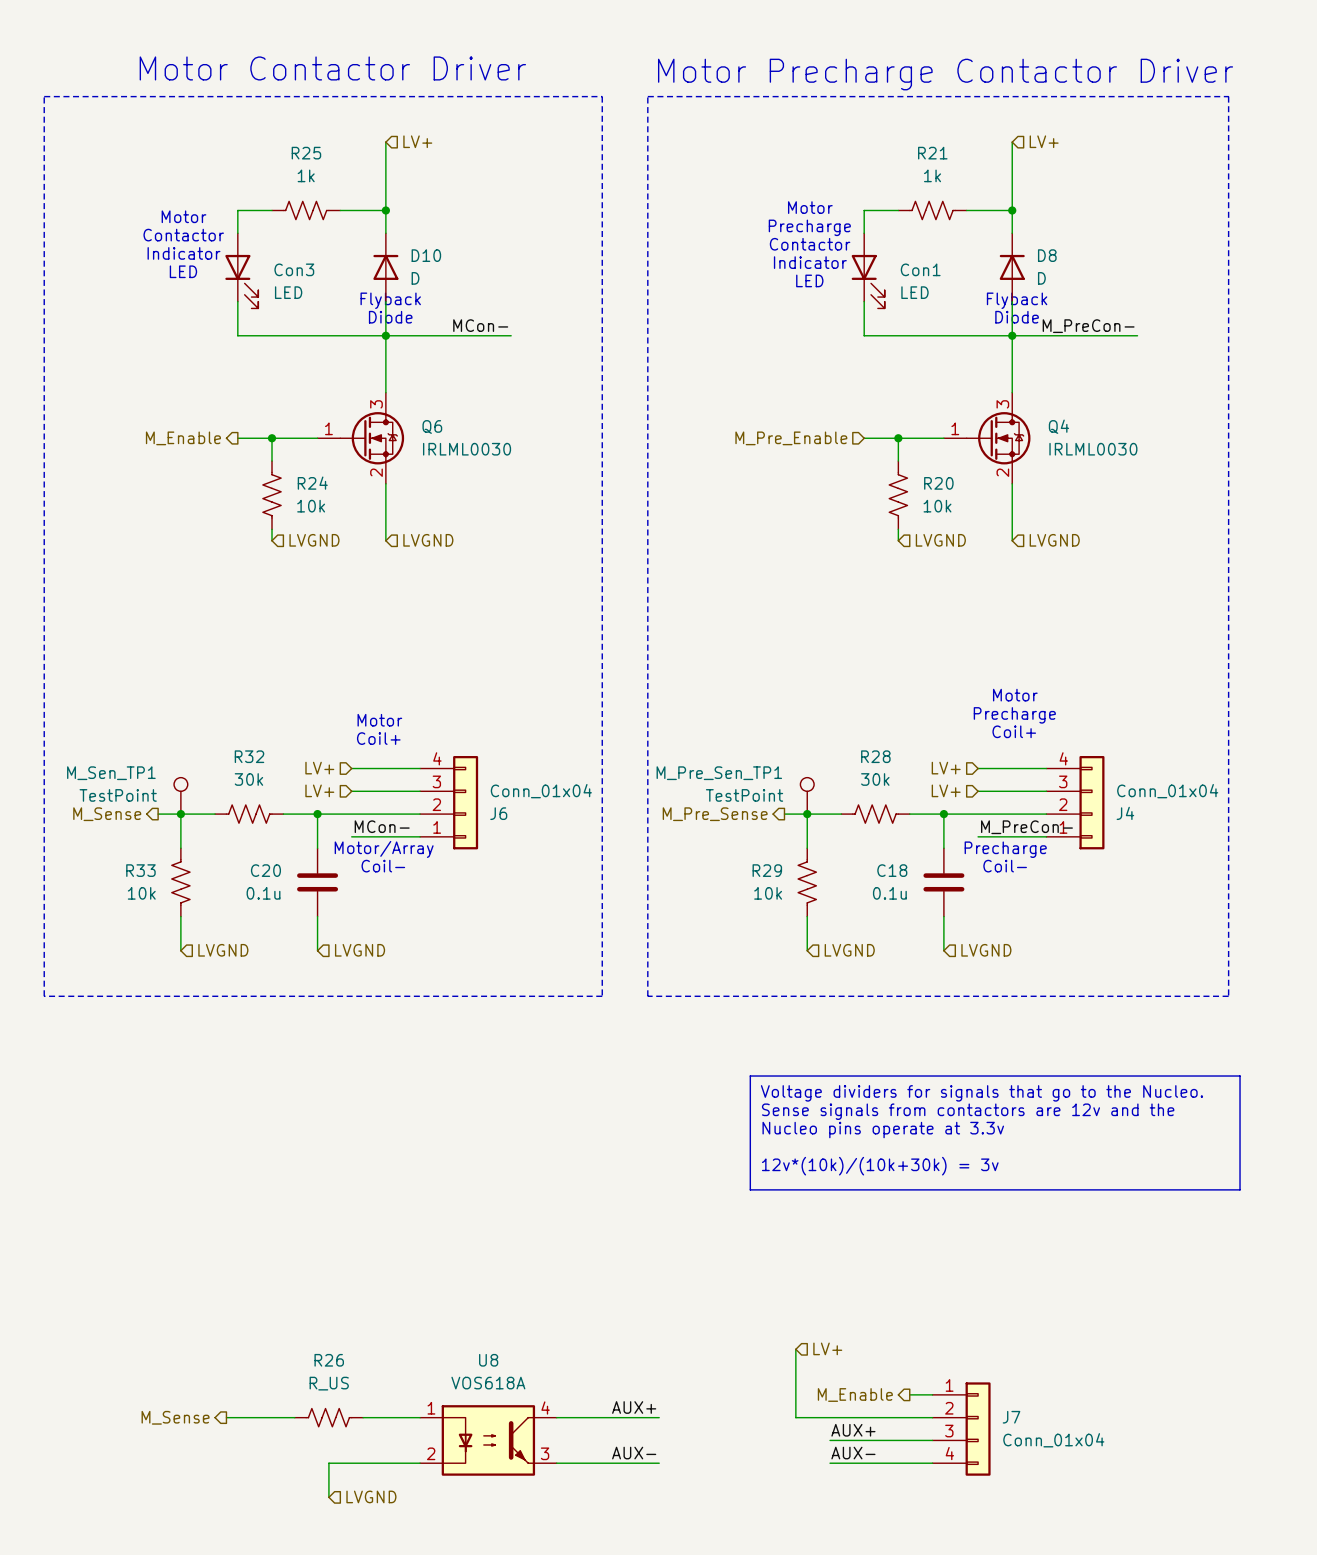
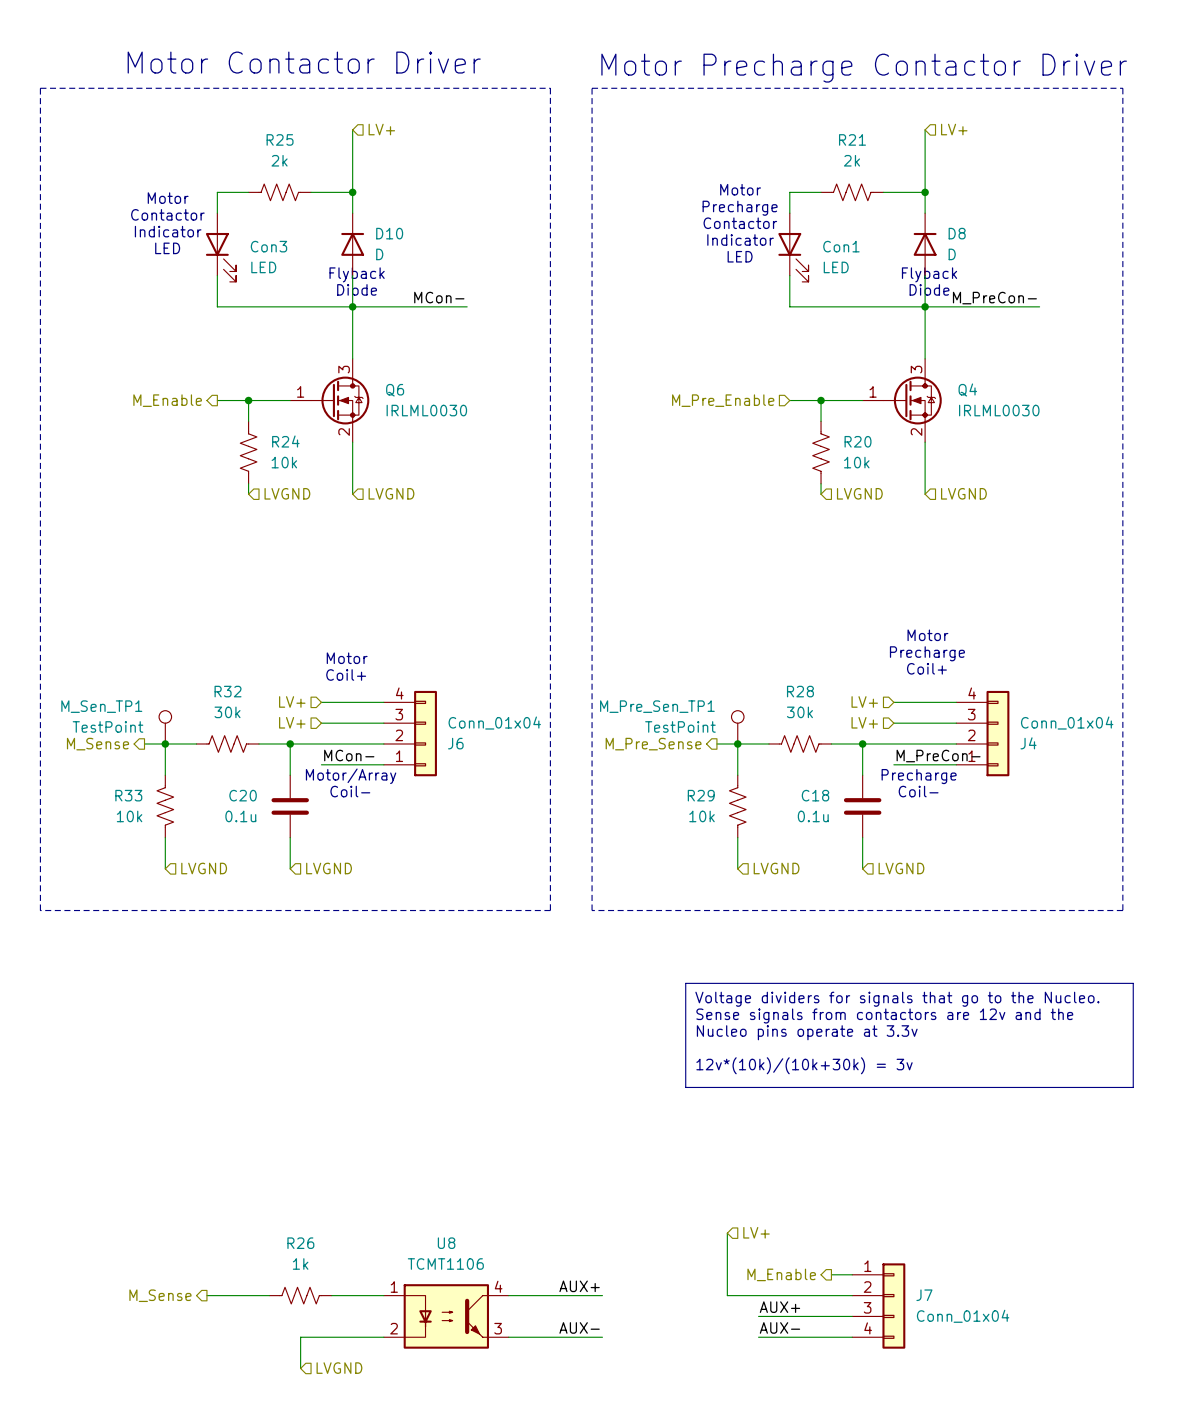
R25 value: 1k (306, 175) -> 2k (279, 160)
R21 value: 1k (932, 175) -> 2k (851, 160)
R26 value: R_US (329, 1383) -> 1k (300, 1264)
U8 value: VOS618A (488, 1383) -> TCMT1106 (445, 1264)

